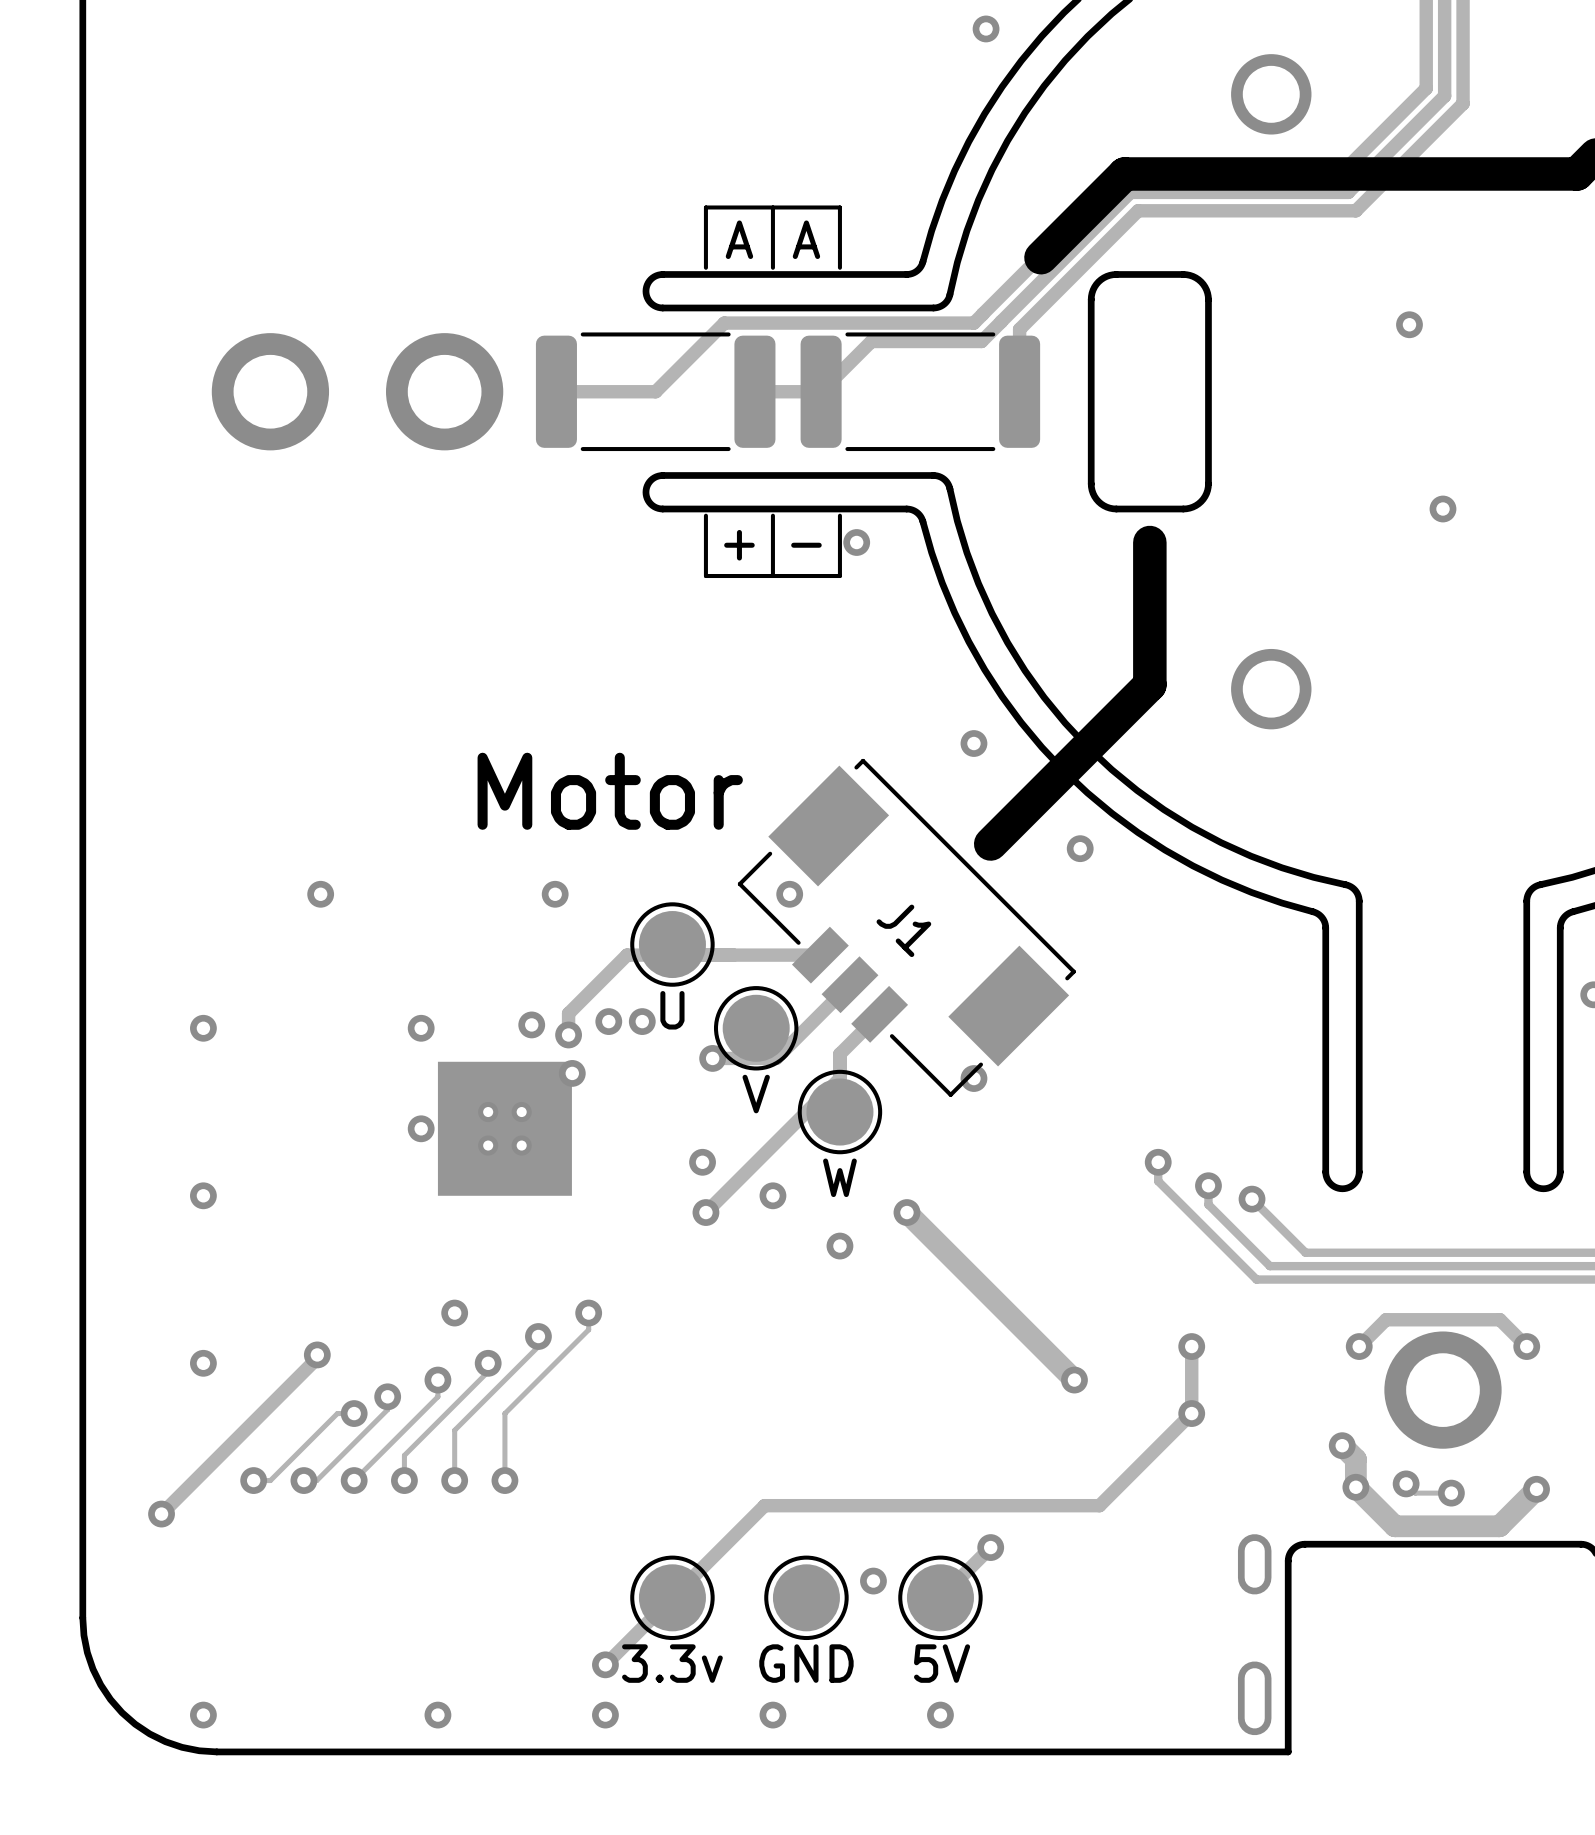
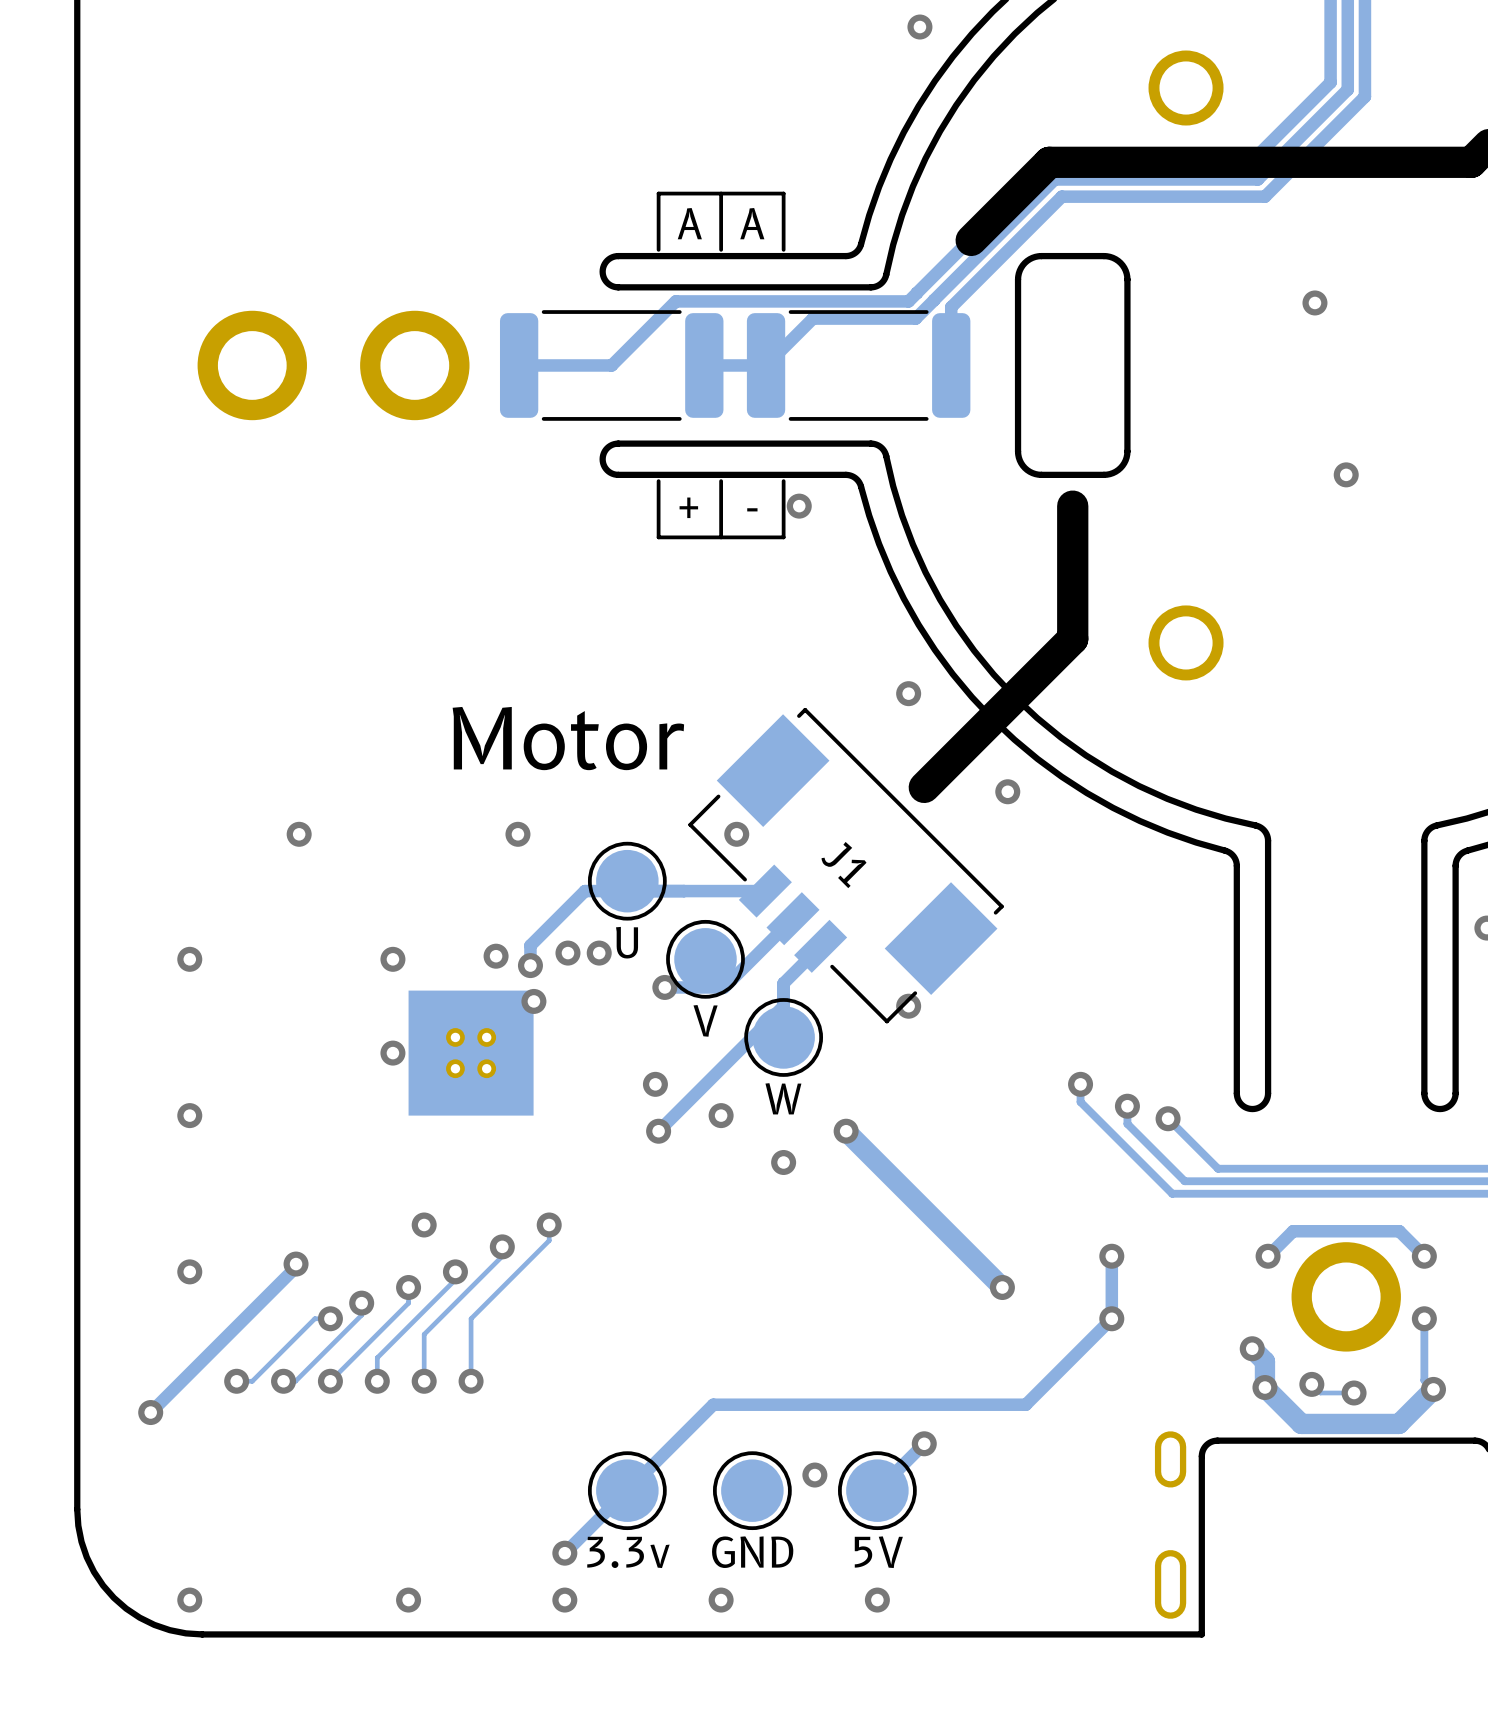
track: none -> (1424, 1318) (1424, 1380) (1433, 1389)
via: none -> (1424, 1318)

